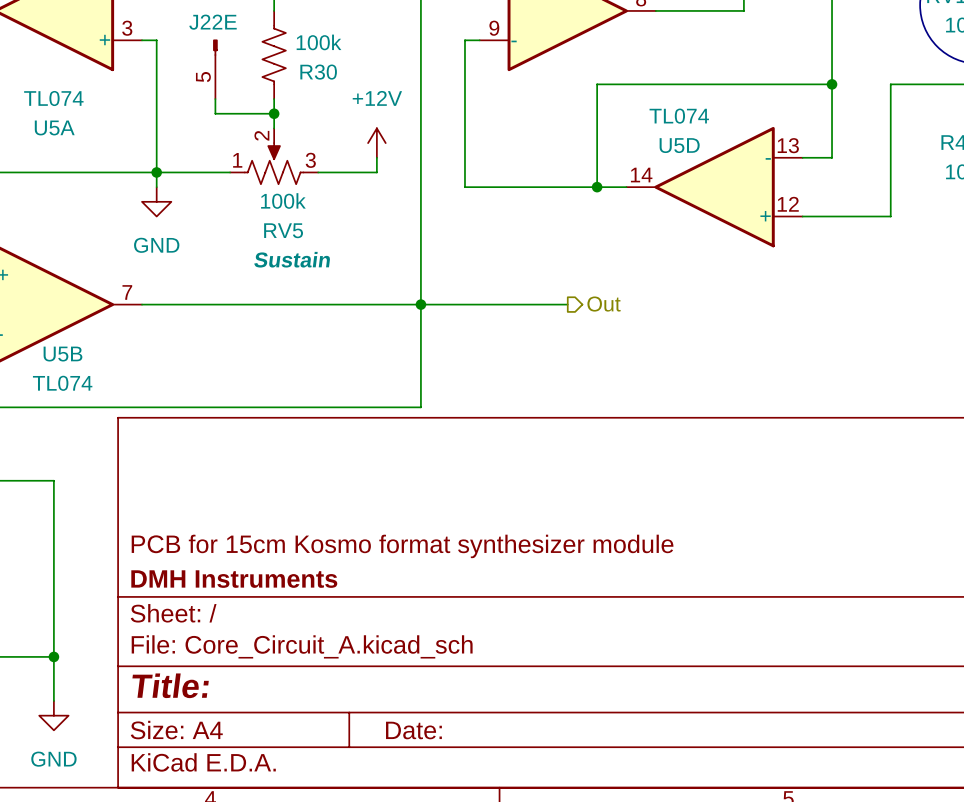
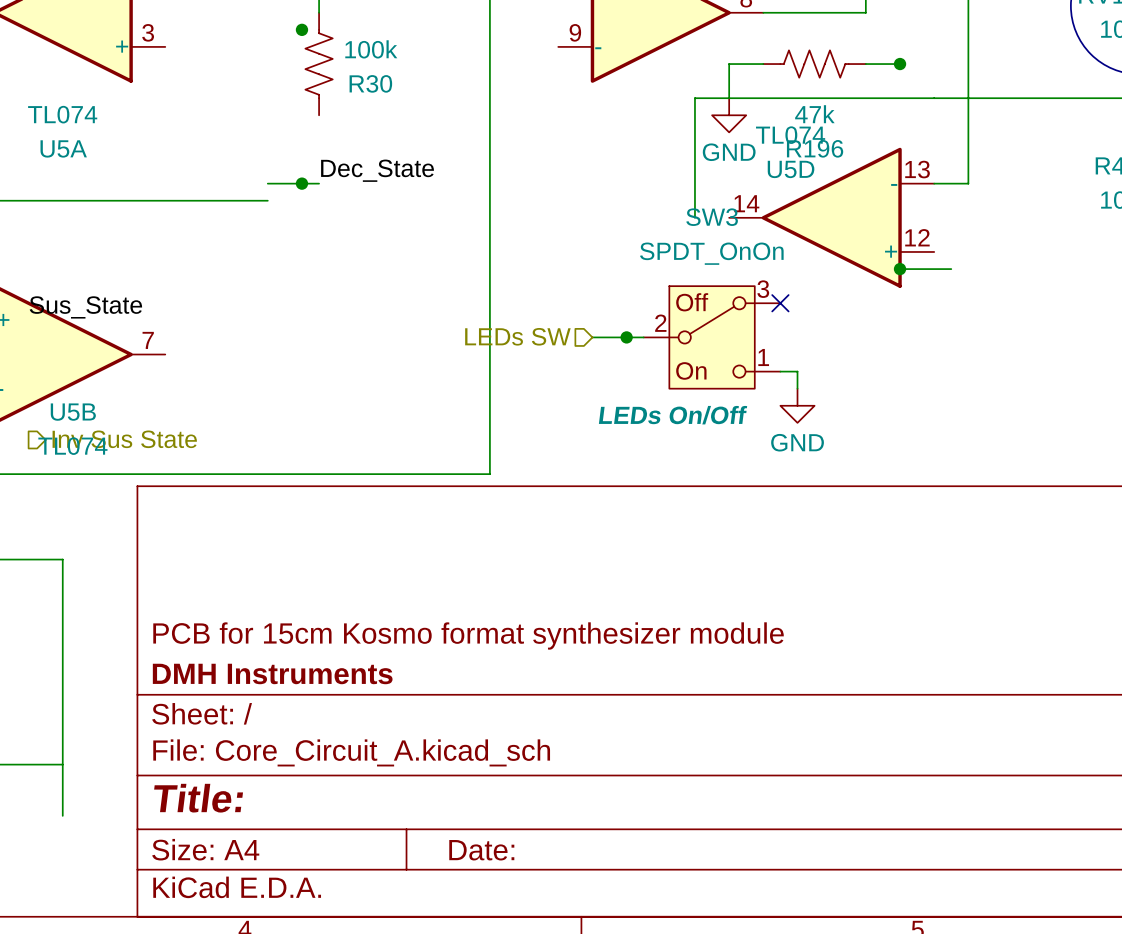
junction: none -> (301, 29)
wire: (142, 40) (156, 40) (156, 187) -> none
wire: (479, 40) (464, 40) (464, 187) (626, 187) -> none
wire: none -> (763, 64) (729, 64) (729, 98)
R196: none -> 47k (814, 64)
wire: none -> (865, 64) (900, 64)
junction: none -> (900, 64)
J22E: (215, 69) -> none
junction: (832, 84) -> none
wire: (890, 84) (890, 216) (802, 216) -> (1036, 98) (968, 98)
wire: (215, 99) (215, 113) (274, 113) -> none
wire: (274, 99) (274, 128) -> none
power symbol: none -> GND (729, 115)
junction: (274, 113) -> none
power symbol: +12V (376, 143) -> none
label: none -> Dec_State (377, 170)
RV5: 100k (274, 156) -> none
wire: none -> (267, 183) (319, 183)
junction: none -> (301, 183)
wire: (376, 157) (376, 172) (318, 172) -> none
junction: (156, 172) -> none
junction: (597, 187) -> none
power symbol: GND (156, 201) -> none
wire: none -> (900, 269) (951, 269)
junction: none -> (900, 269)
no-connect mark: none -> (780, 303)
label: none -> Sus_State (85, 307)
hierarchical label: none -> LEDs SW (517, 336)
wire: none -> (592, 337) (643, 337)
junction: none -> (626, 337)
SW3: none -> SPDT_OnOn (712, 337)
wire: (142, 304) (567, 304) -> none
junction: (420, 304) -> none
hierarchical label: Out (604, 304) -> none
wire: none -> (780, 371) (797, 371) (797, 388)
power symbol: none -> GND (797, 405)
hierarchical label: none -> Inv Sus State (124, 439)
junction: (53, 656) -> none
power symbol: GND (53, 715) -> none

